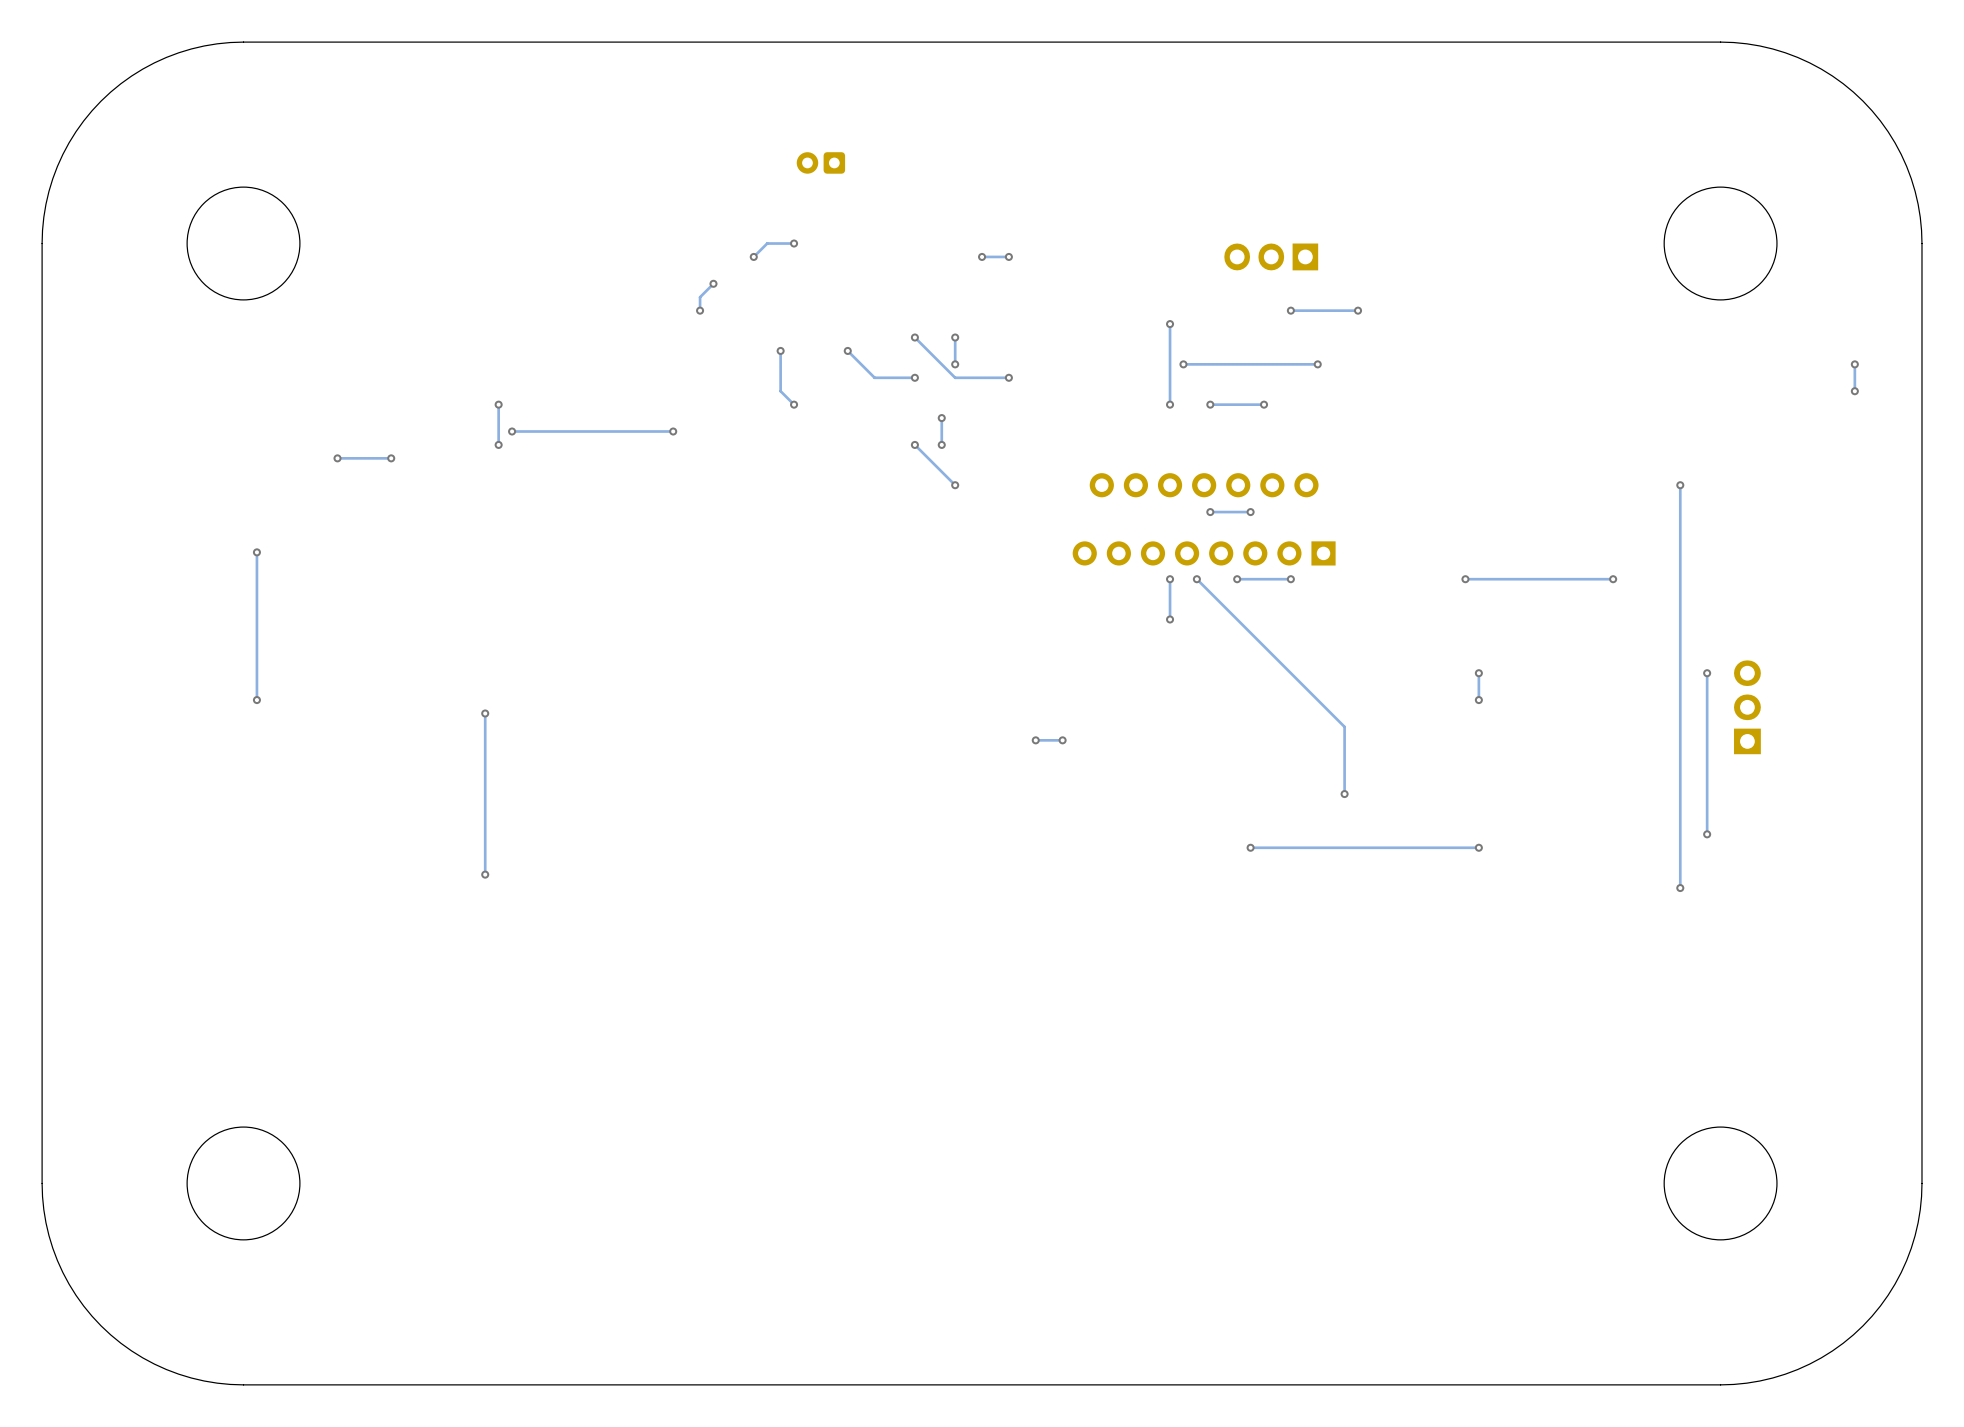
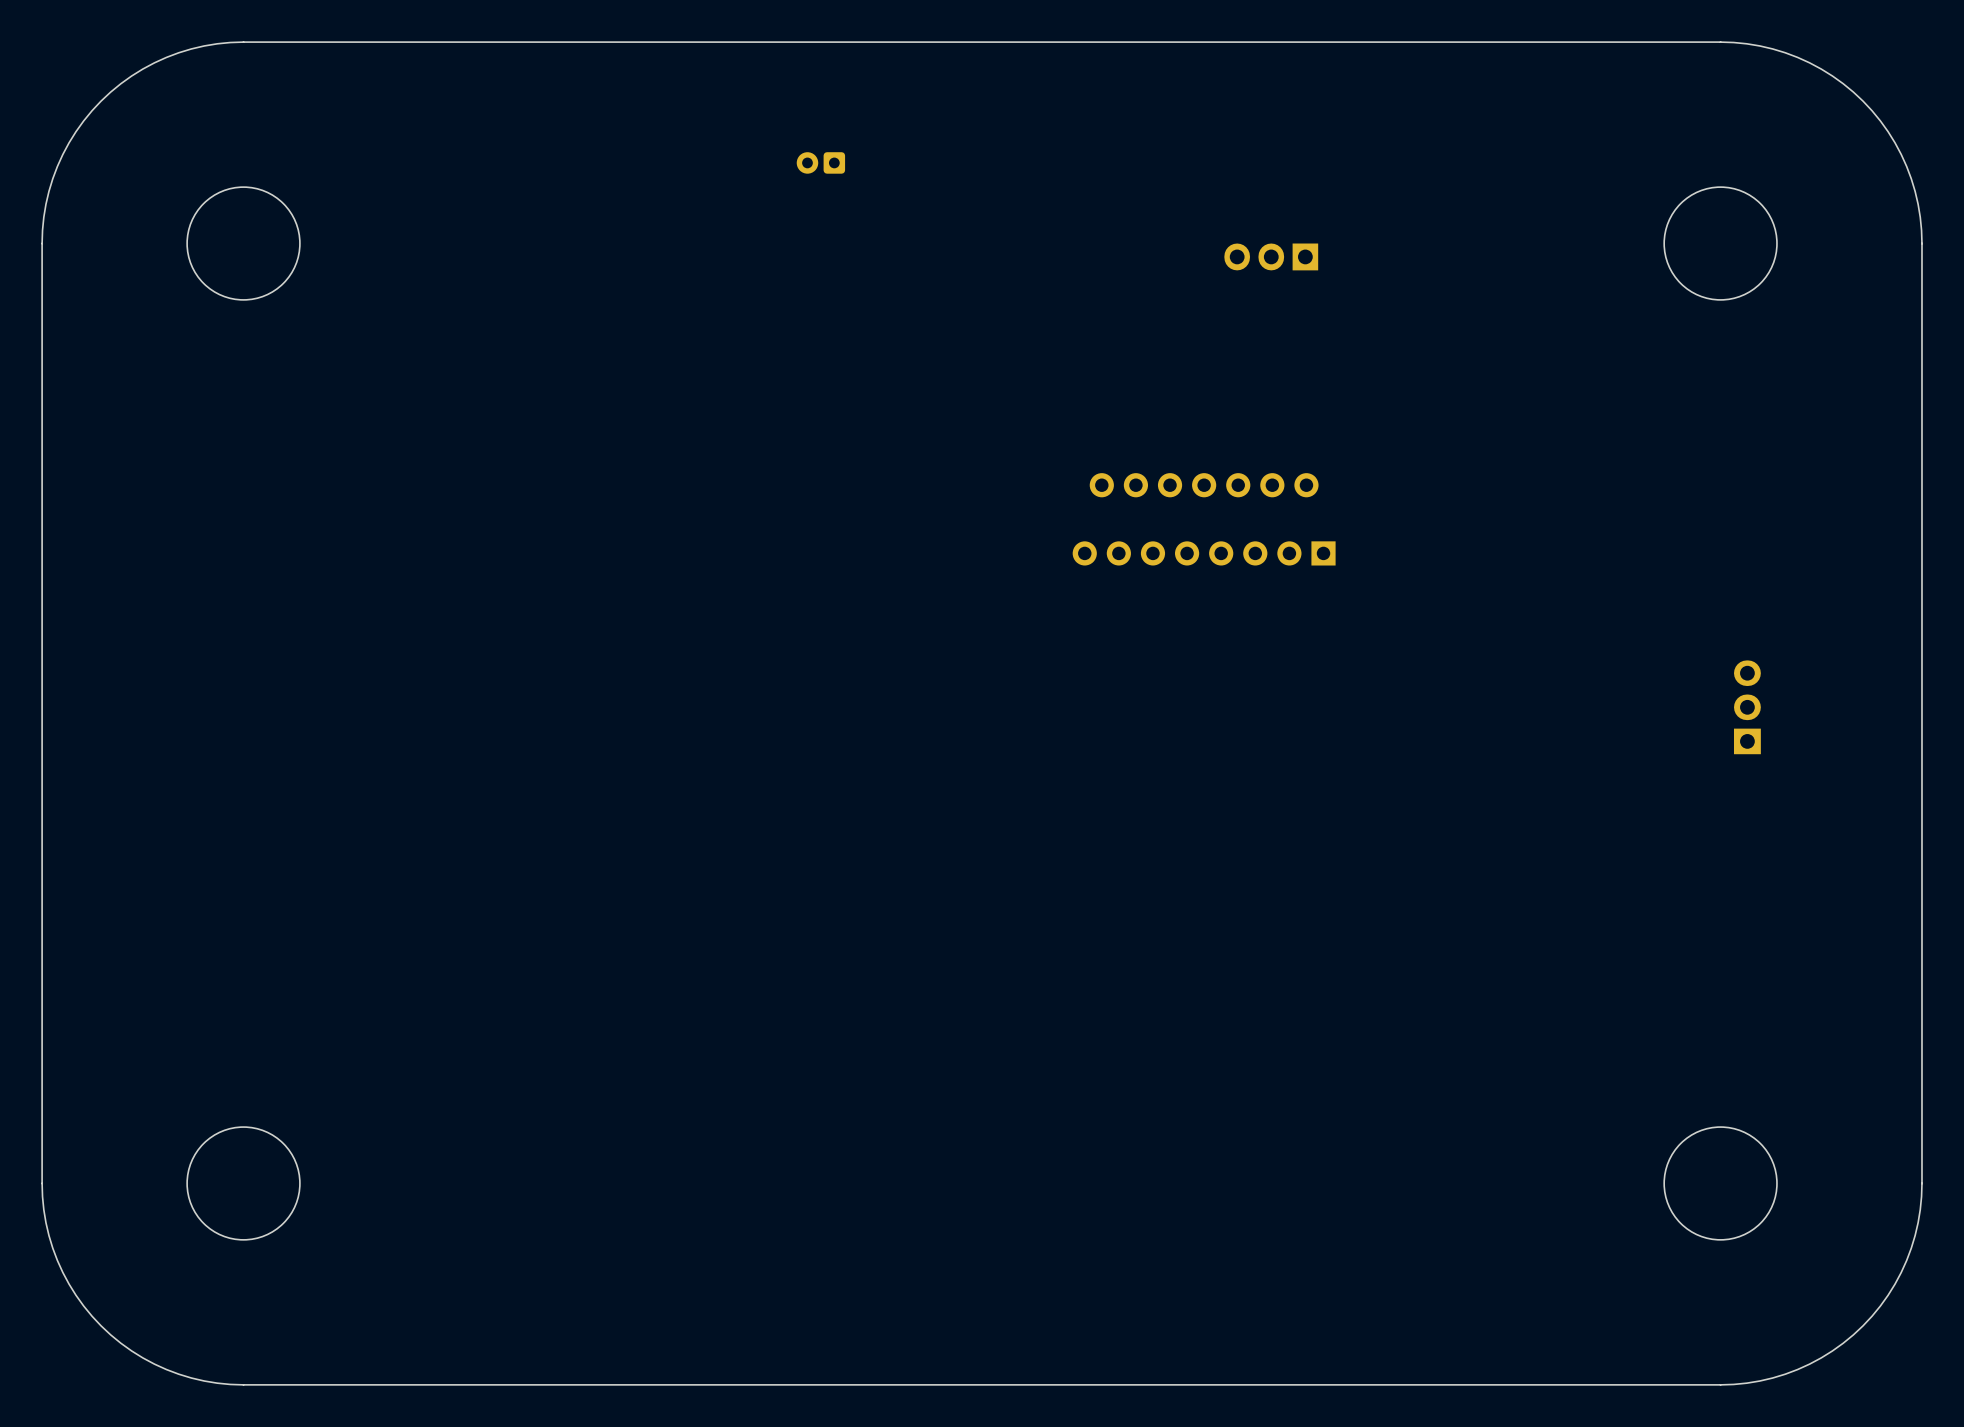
track: (794, 243) (767, 243) (753, 256) -> none
via: (794, 243) -> none
via: (753, 256) -> none
via: (982, 256) -> none
track: (1008, 256) (982, 256) -> none
via: (1008, 256) -> none
track: (713, 283) (700, 297) (700, 310) -> none
via: (713, 283) -> none
via: (700, 310) -> none
via: (1290, 310) -> none
track: (1358, 310) (1290, 310) -> none
via: (1358, 310) -> none
track: (1170, 324) (1170, 404) -> none
via: (1170, 324) -> none
track: (914, 337) (955, 377) (1008, 377) -> none
via: (914, 337) -> none
track: (955, 337) (955, 364) -> none
via: (955, 337) -> none
track: (780, 350) (780, 391) (794, 404) -> none
via: (780, 350) -> none
track: (847, 350) (874, 377) (914, 377) -> none
via: (847, 350) -> none
via: (955, 364) -> none
via: (1183, 364) -> none
track: (1317, 364) (1183, 364) -> none
via: (1317, 364) -> none
track: (1854, 364) (1854, 391) -> none
via: (1854, 364) -> none
via: (914, 377) -> none
via: (1008, 377) -> none
via: (1854, 391) -> none
track: (498, 404) (498, 444) -> none
via: (498, 404) -> none
via: (794, 404) -> none
via: (1170, 404) -> none
via: (1210, 404) -> none
track: (1264, 404) (1210, 404) -> none
via: (1264, 404) -> none
track: (941, 418) (941, 444) -> none
via: (941, 418) -> none
via: (512, 431) -> none
track: (673, 431) (512, 431) -> none
via: (673, 431) -> none
via: (498, 444) -> none
track: (914, 444) (955, 485) -> none
via: (914, 444) -> none
via: (941, 444) -> none
via: (337, 458) -> none
track: (391, 458) (337, 458) -> none
via: (391, 458) -> none
via: (955, 485) -> none
track: (1680, 485) (1680, 888) -> none
via: (1680, 485) -> none
via: (1210, 512) -> none
track: (1250, 512) (1210, 512) -> none
via: (1250, 512) -> none
track: (256, 552) (256, 700) -> none
via: (256, 552) -> none
track: (1170, 579) (1170, 619) -> none
via: (1170, 579) -> none
track: (1196, 579) (1344, 726) (1344, 794) -> none
via: (1196, 579) -> none
via: (1237, 579) -> none
track: (1290, 579) (1237, 579) -> none
via: (1290, 579) -> none
via: (1465, 579) -> none
track: (1613, 579) (1465, 579) -> none
via: (1613, 579) -> none
via: (1170, 619) -> none
track: (1478, 673) (1478, 700) -> none
via: (1478, 673) -> none
track: (1707, 673) (1707, 834) -> none
via: (1707, 673) -> none
via: (256, 700) -> none
via: (1478, 700) -> none
track: (485, 713) (485, 874) -> none
via: (485, 713) -> none
via: (1035, 740) -> none
track: (1062, 740) (1035, 740) -> none
via: (1062, 740) -> none
via: (1344, 794) -> none
via: (1707, 834) -> none
via: (1250, 847) -> none
track: (1478, 847) (1250, 847) -> none
via: (1478, 847) -> none
via: (485, 874) -> none
via: (1680, 888) -> none

